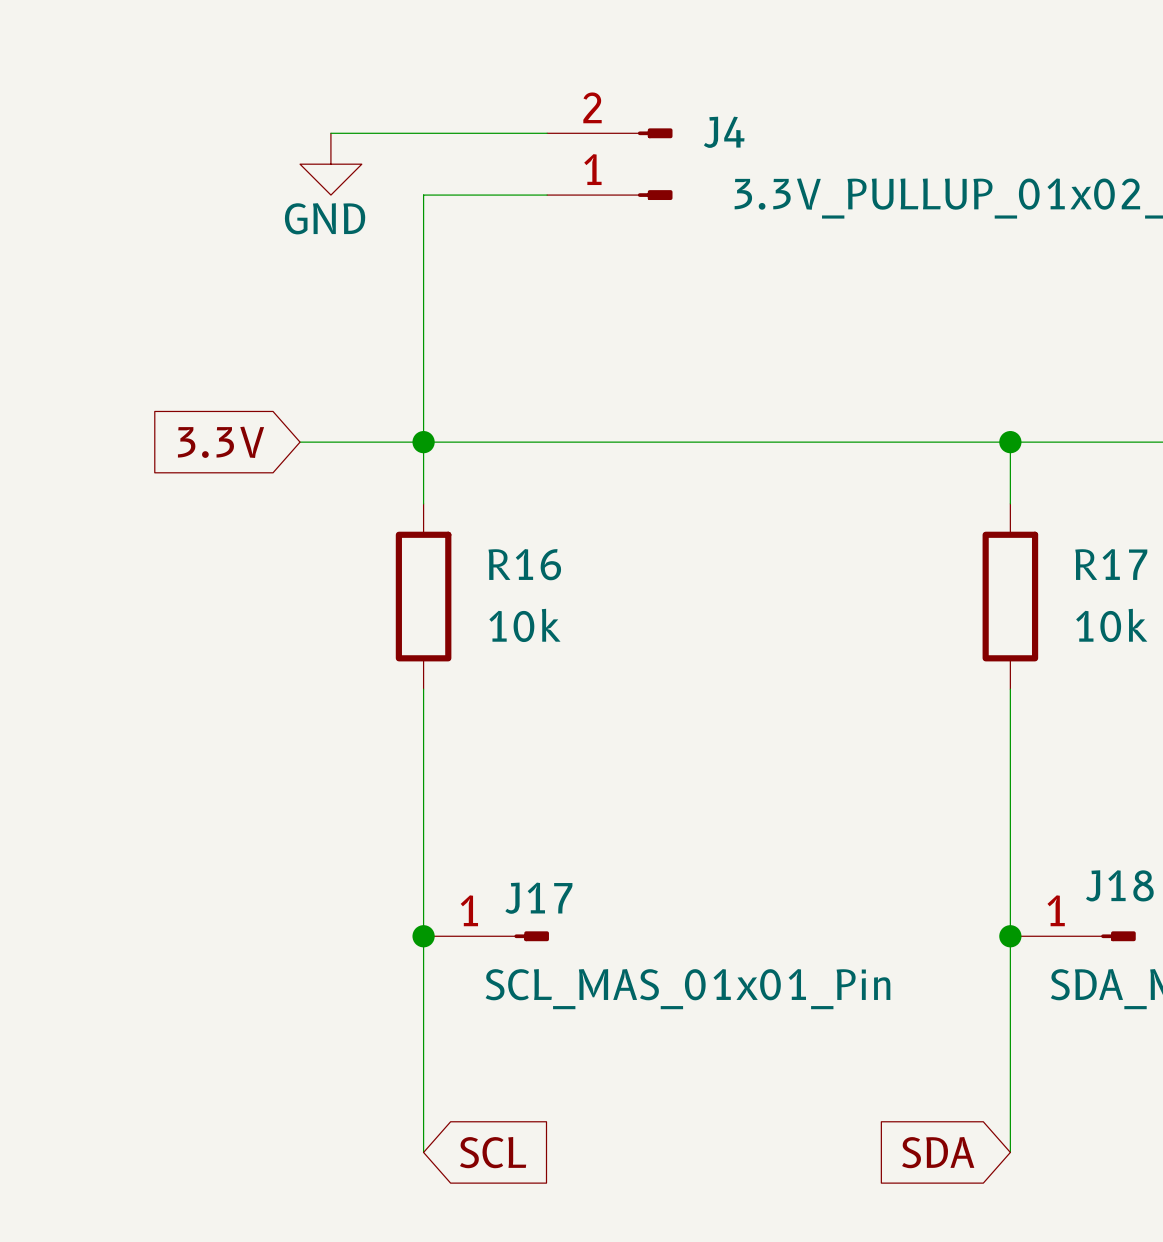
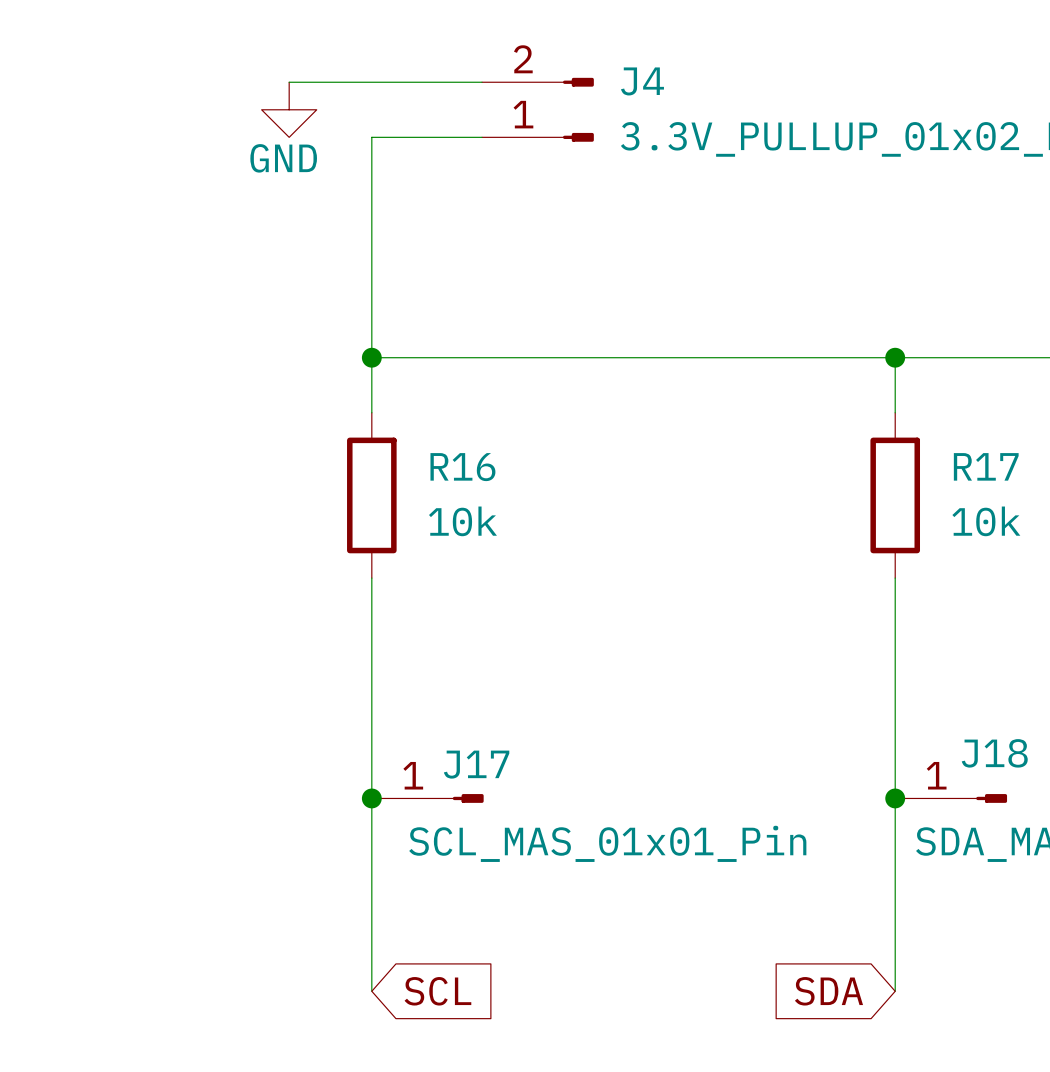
global label: 3.3V (221, 442) -> none
wire: (300, 442) (423, 442) -> none

